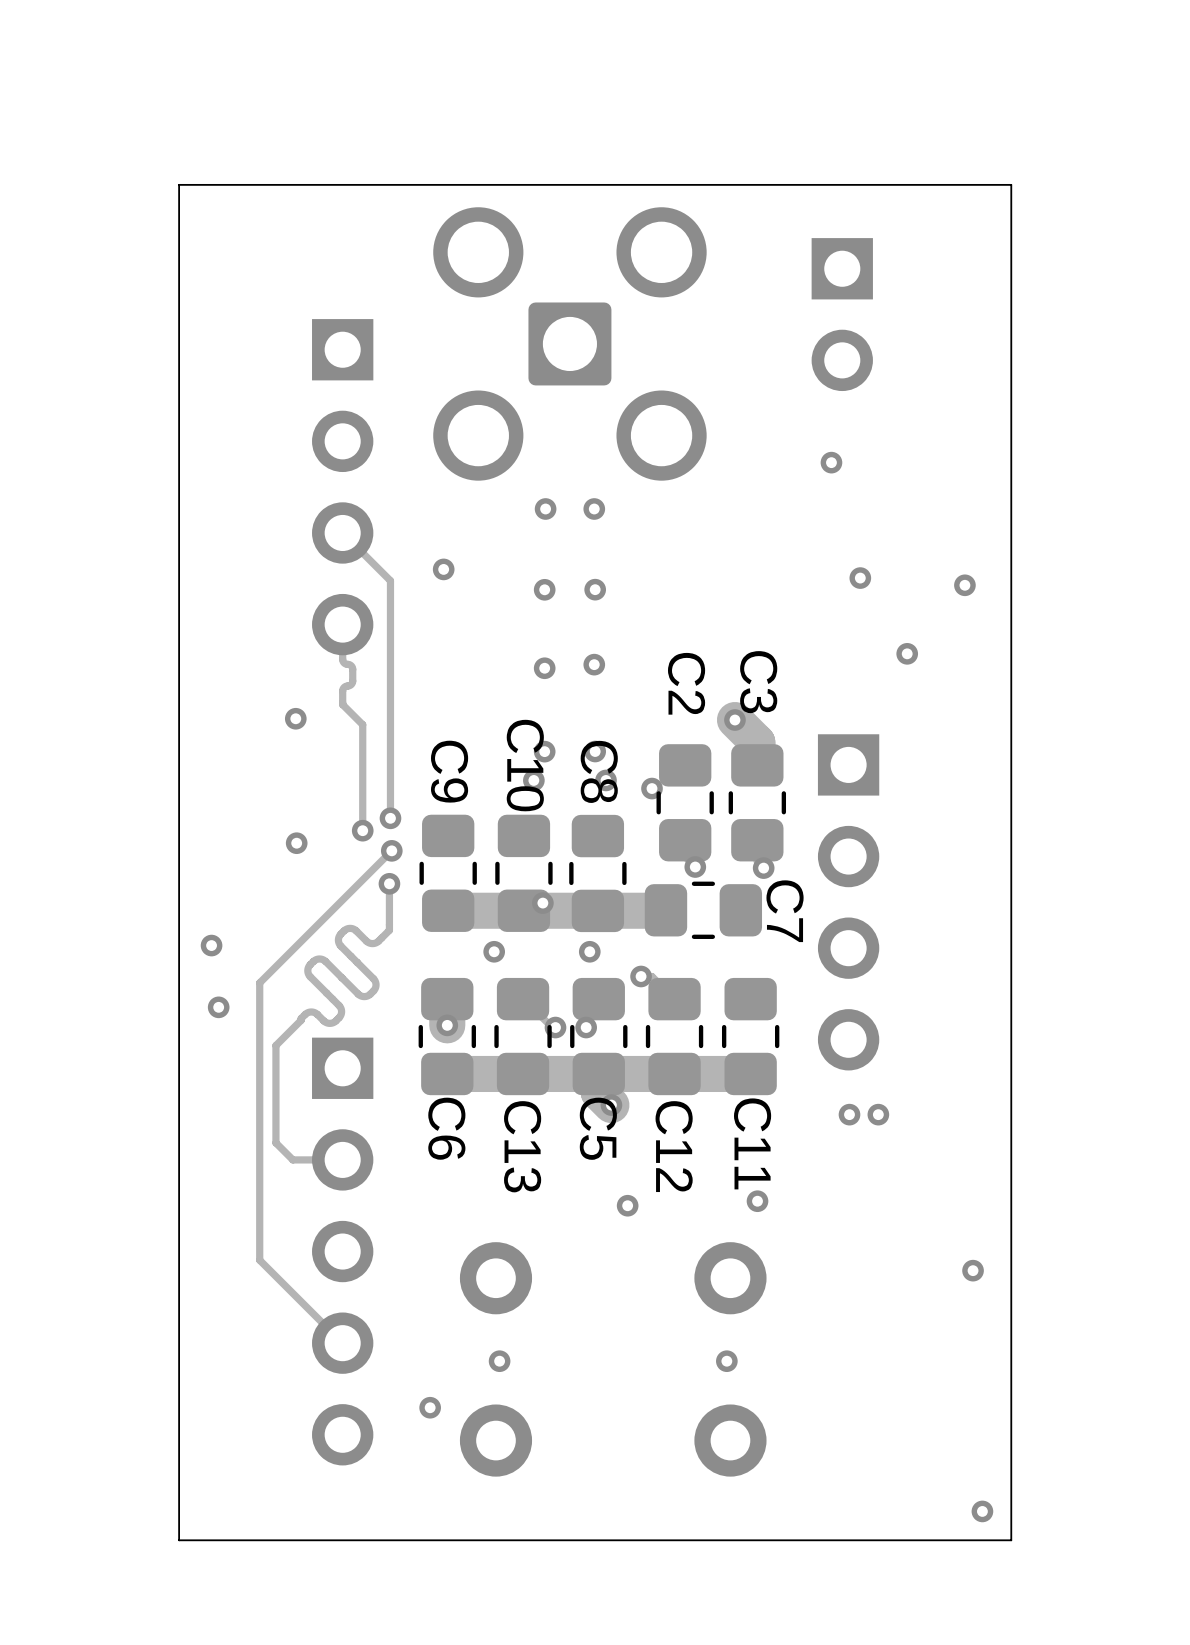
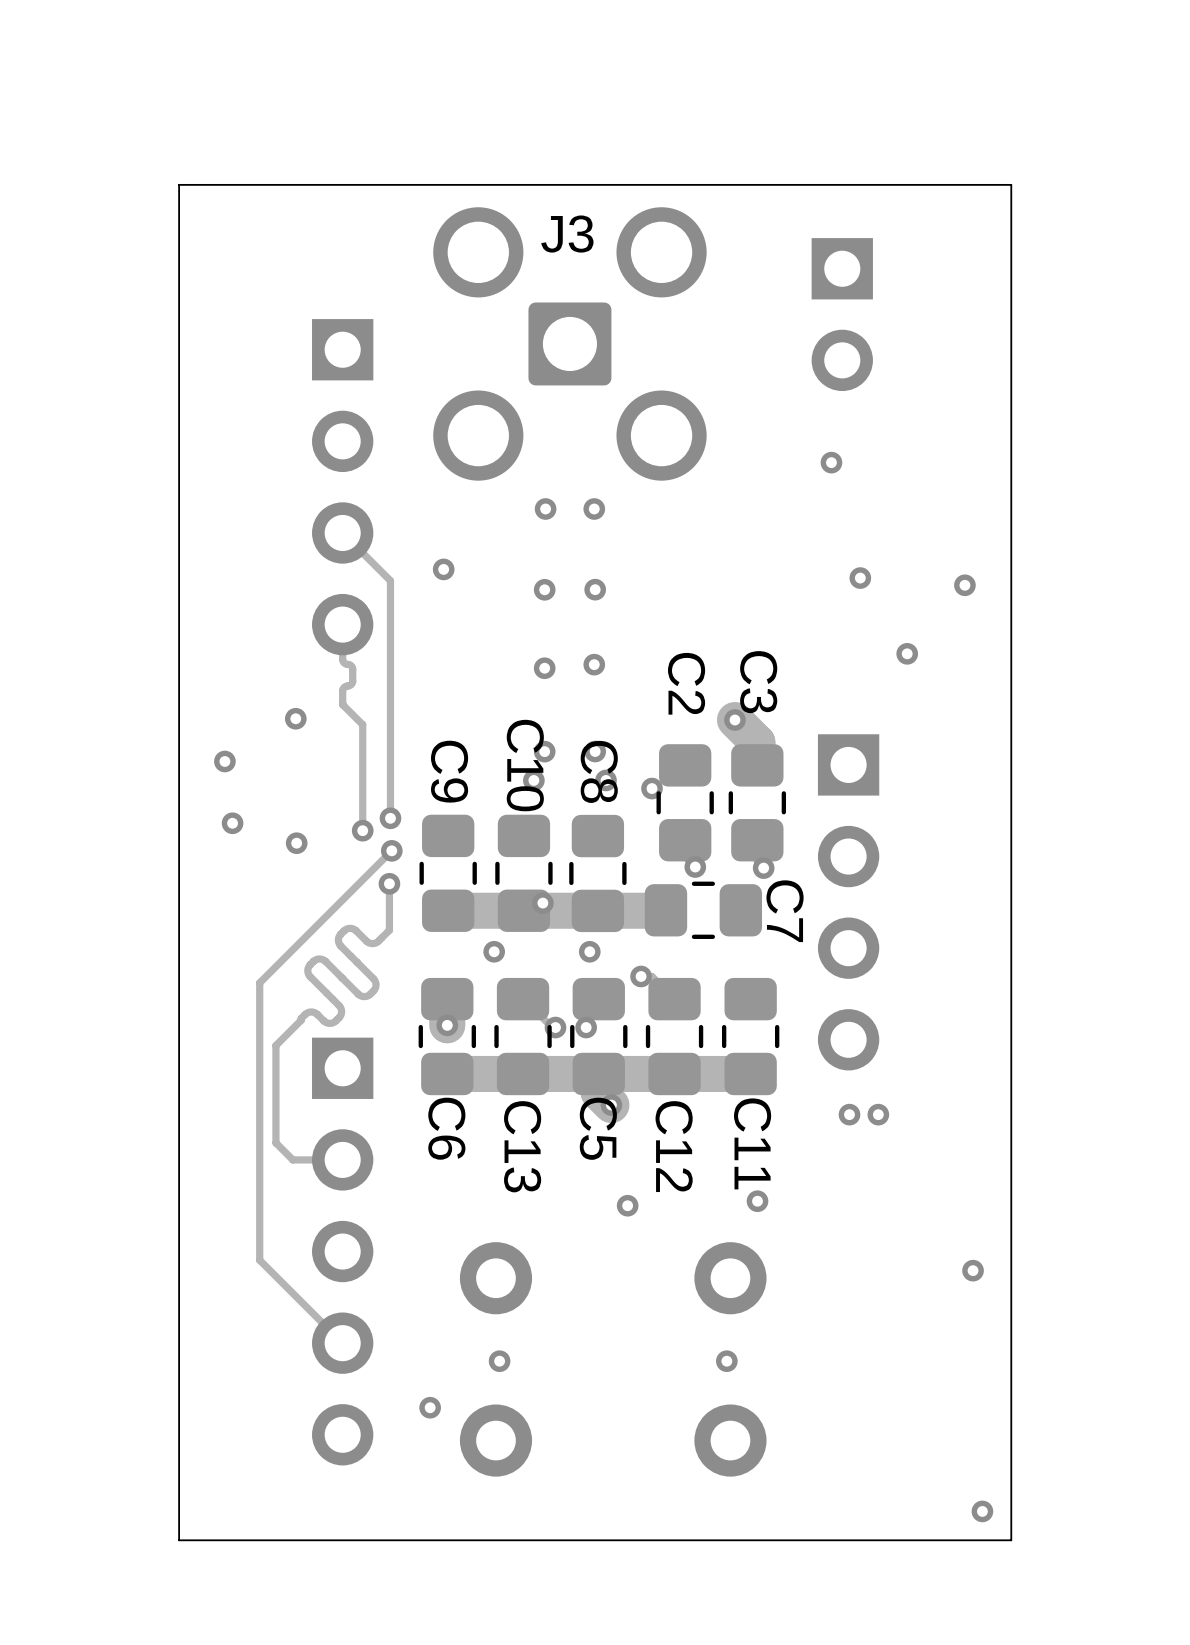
J3 name: none -> J3 (567, 234)
via: none -> (224, 761)
via: none -> (232, 823)
via: (211, 945) -> none
via: (218, 1007) -> none

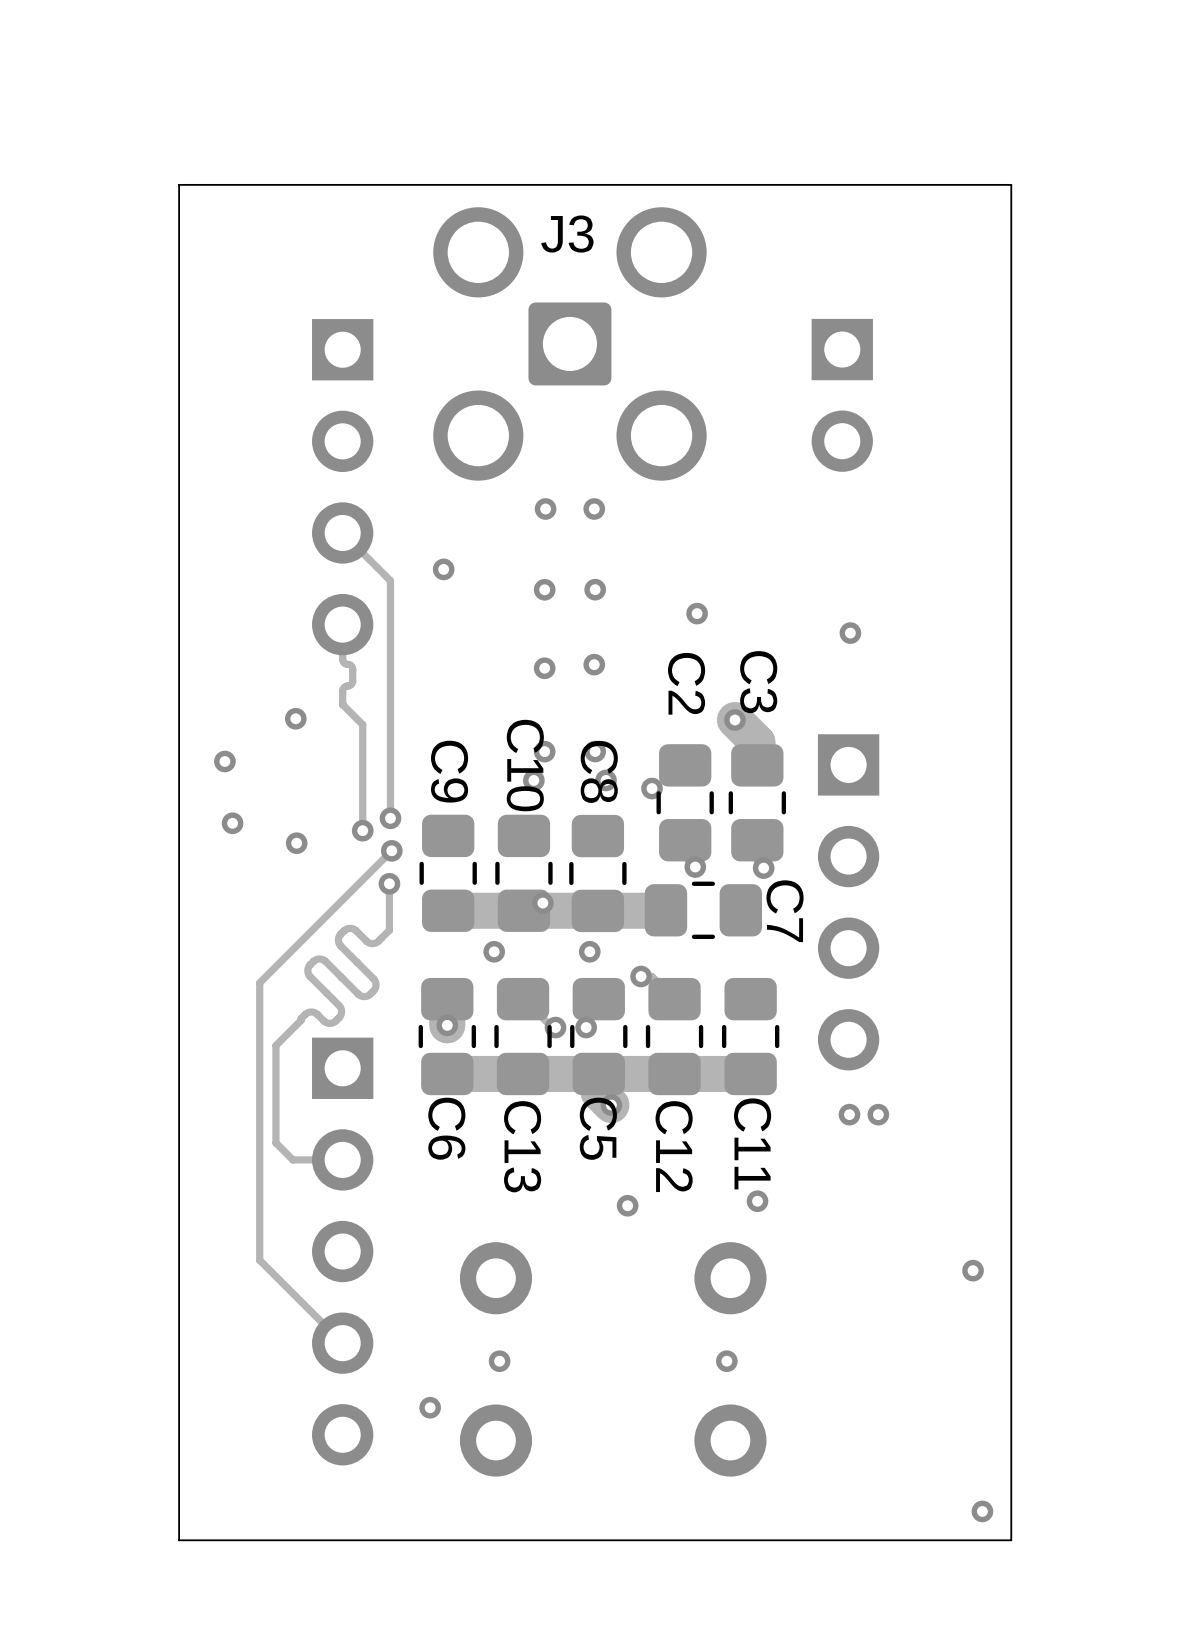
part position: (842, 314) -> (842, 395)
via: (831, 462) -> none
via: (860, 578) -> none
via: (964, 585) -> none
via: none -> (697, 613)
via: none -> (850, 633)
via: (907, 653) -> none

